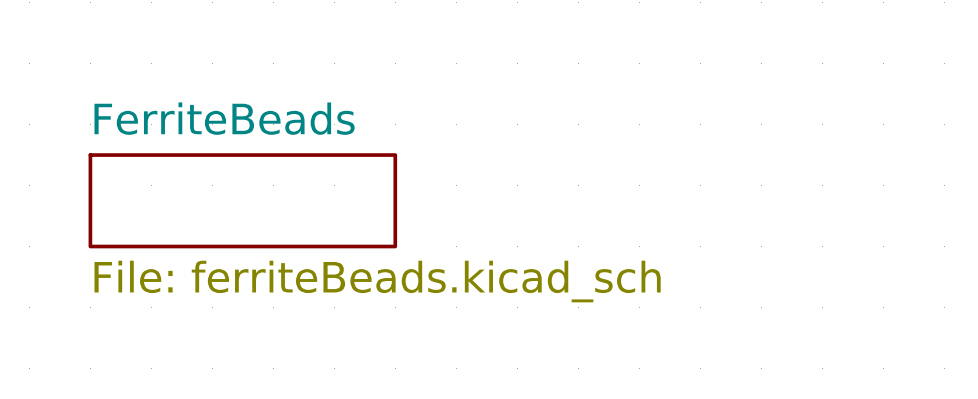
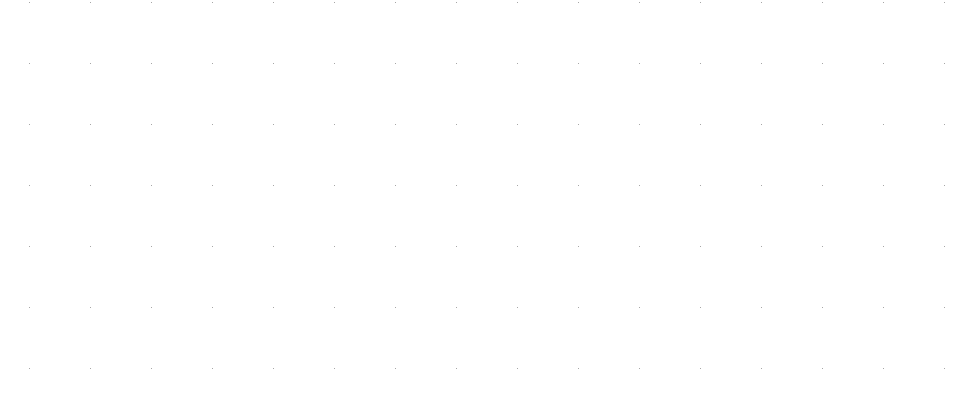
sheet FerriteBeads: File: ferriteBeads.kicad_sch (242, 200) -> none

